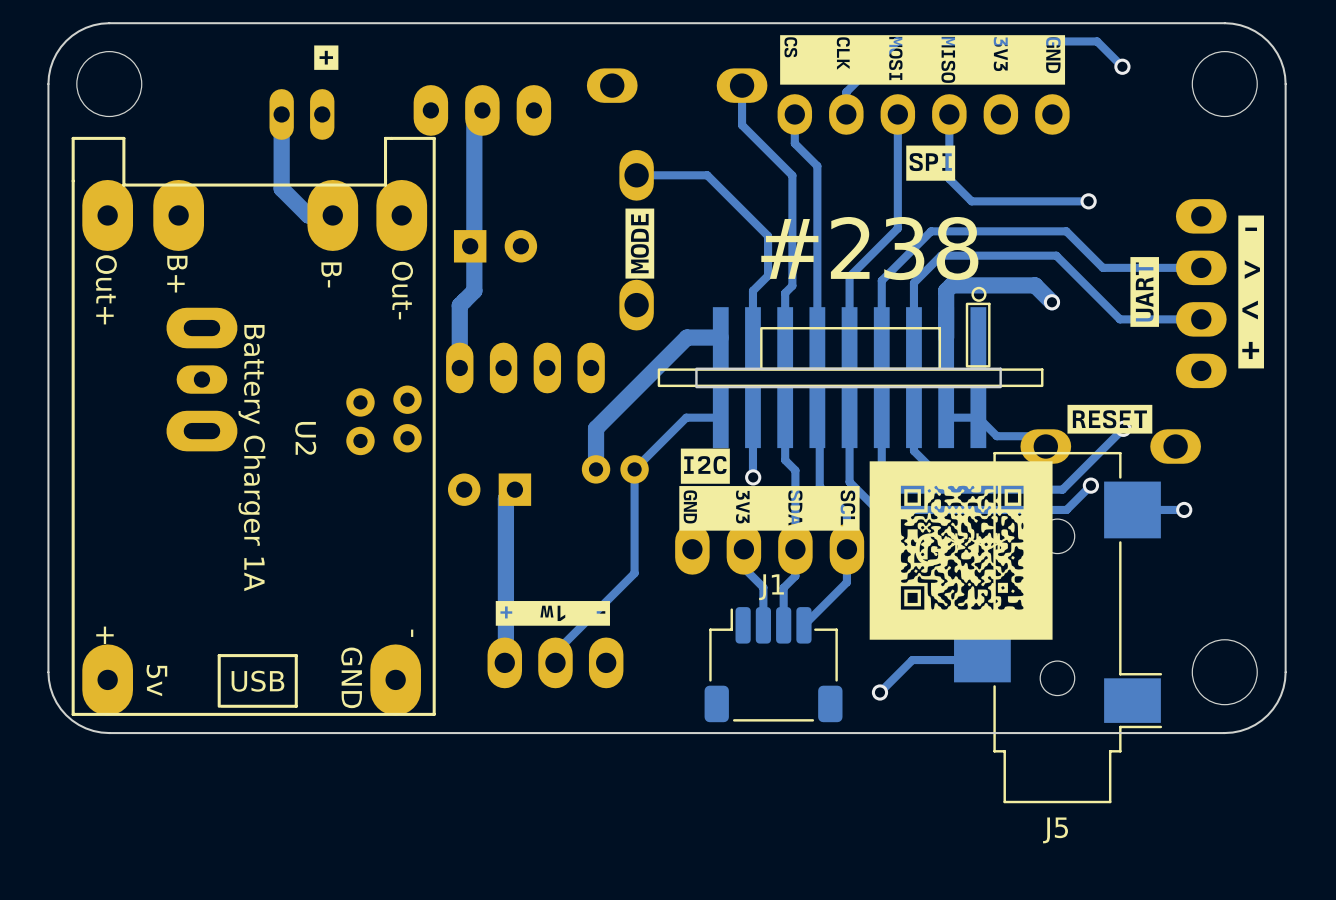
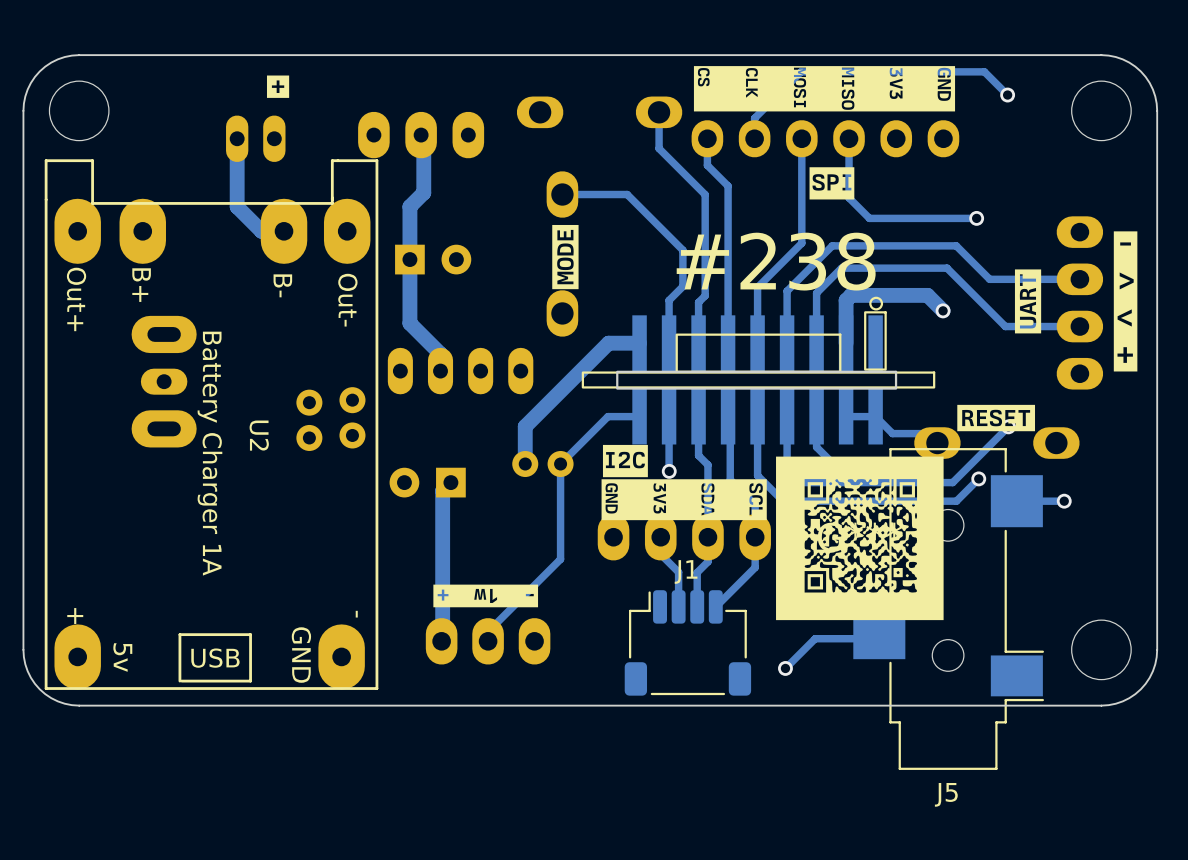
track: (482, 110) (474, 118) (474, 290) (459, 305) (459, 367) -> (421, 135) (423, 137) (423, 192) (409, 206) (409, 323) (440, 353) (440, 371)

